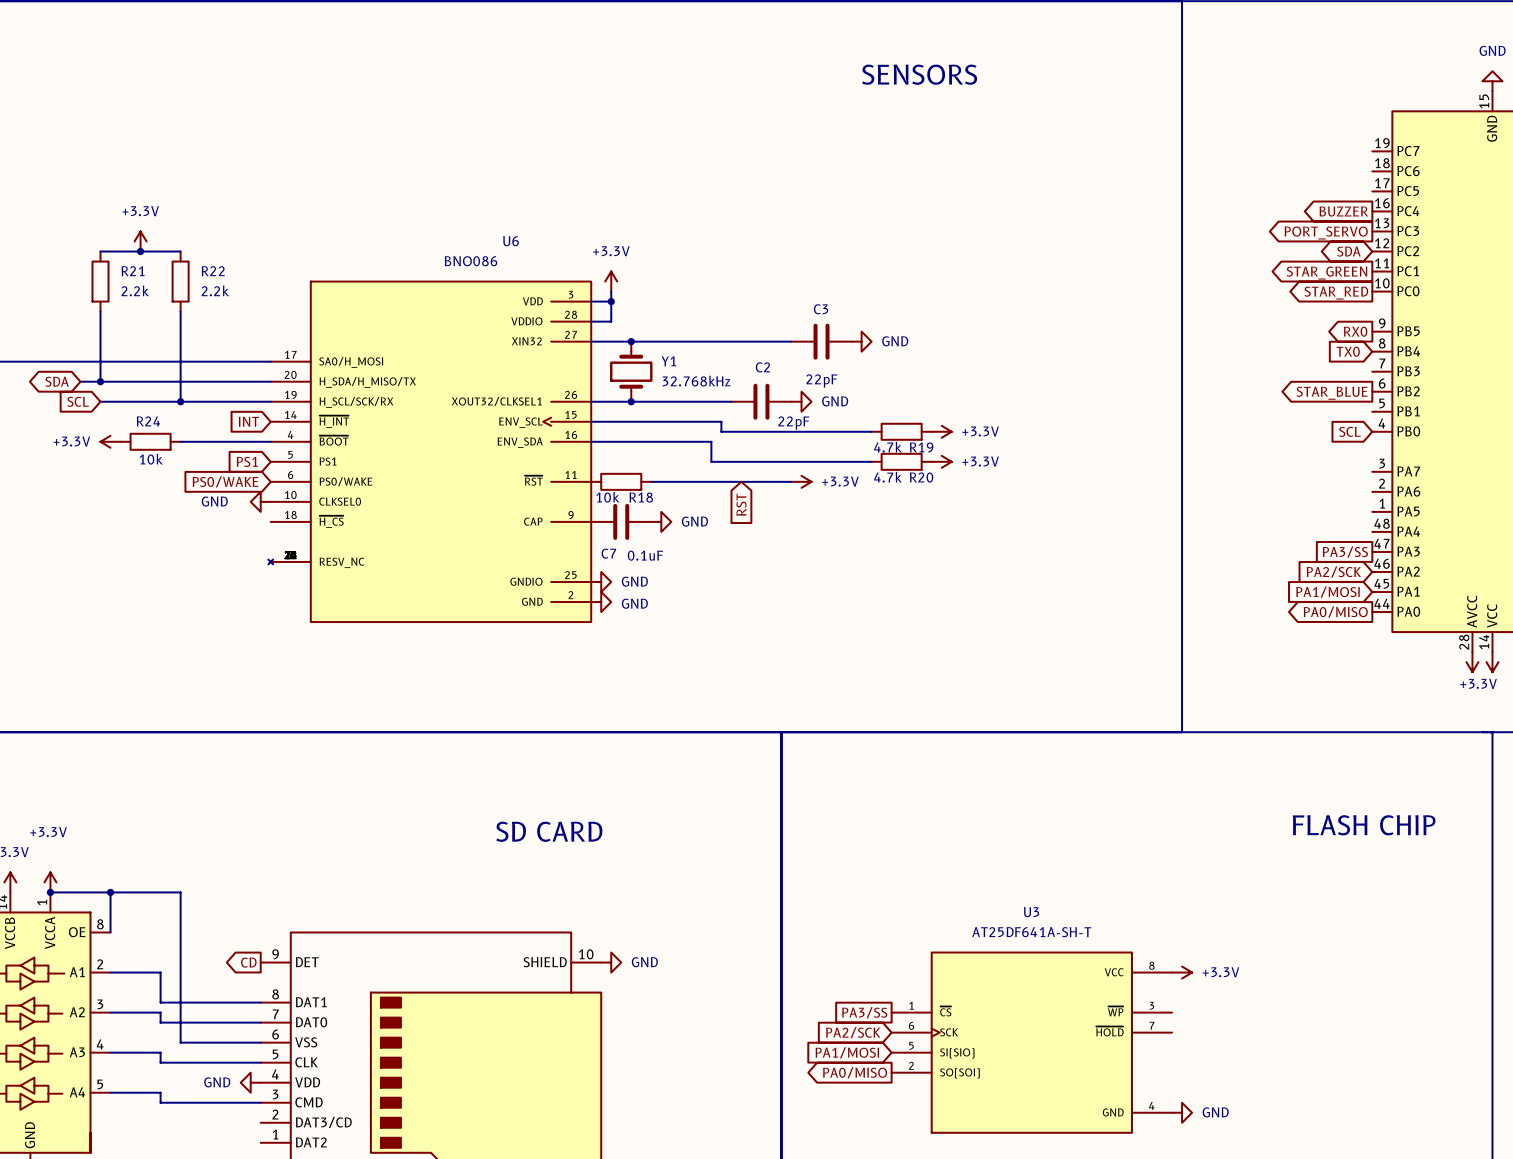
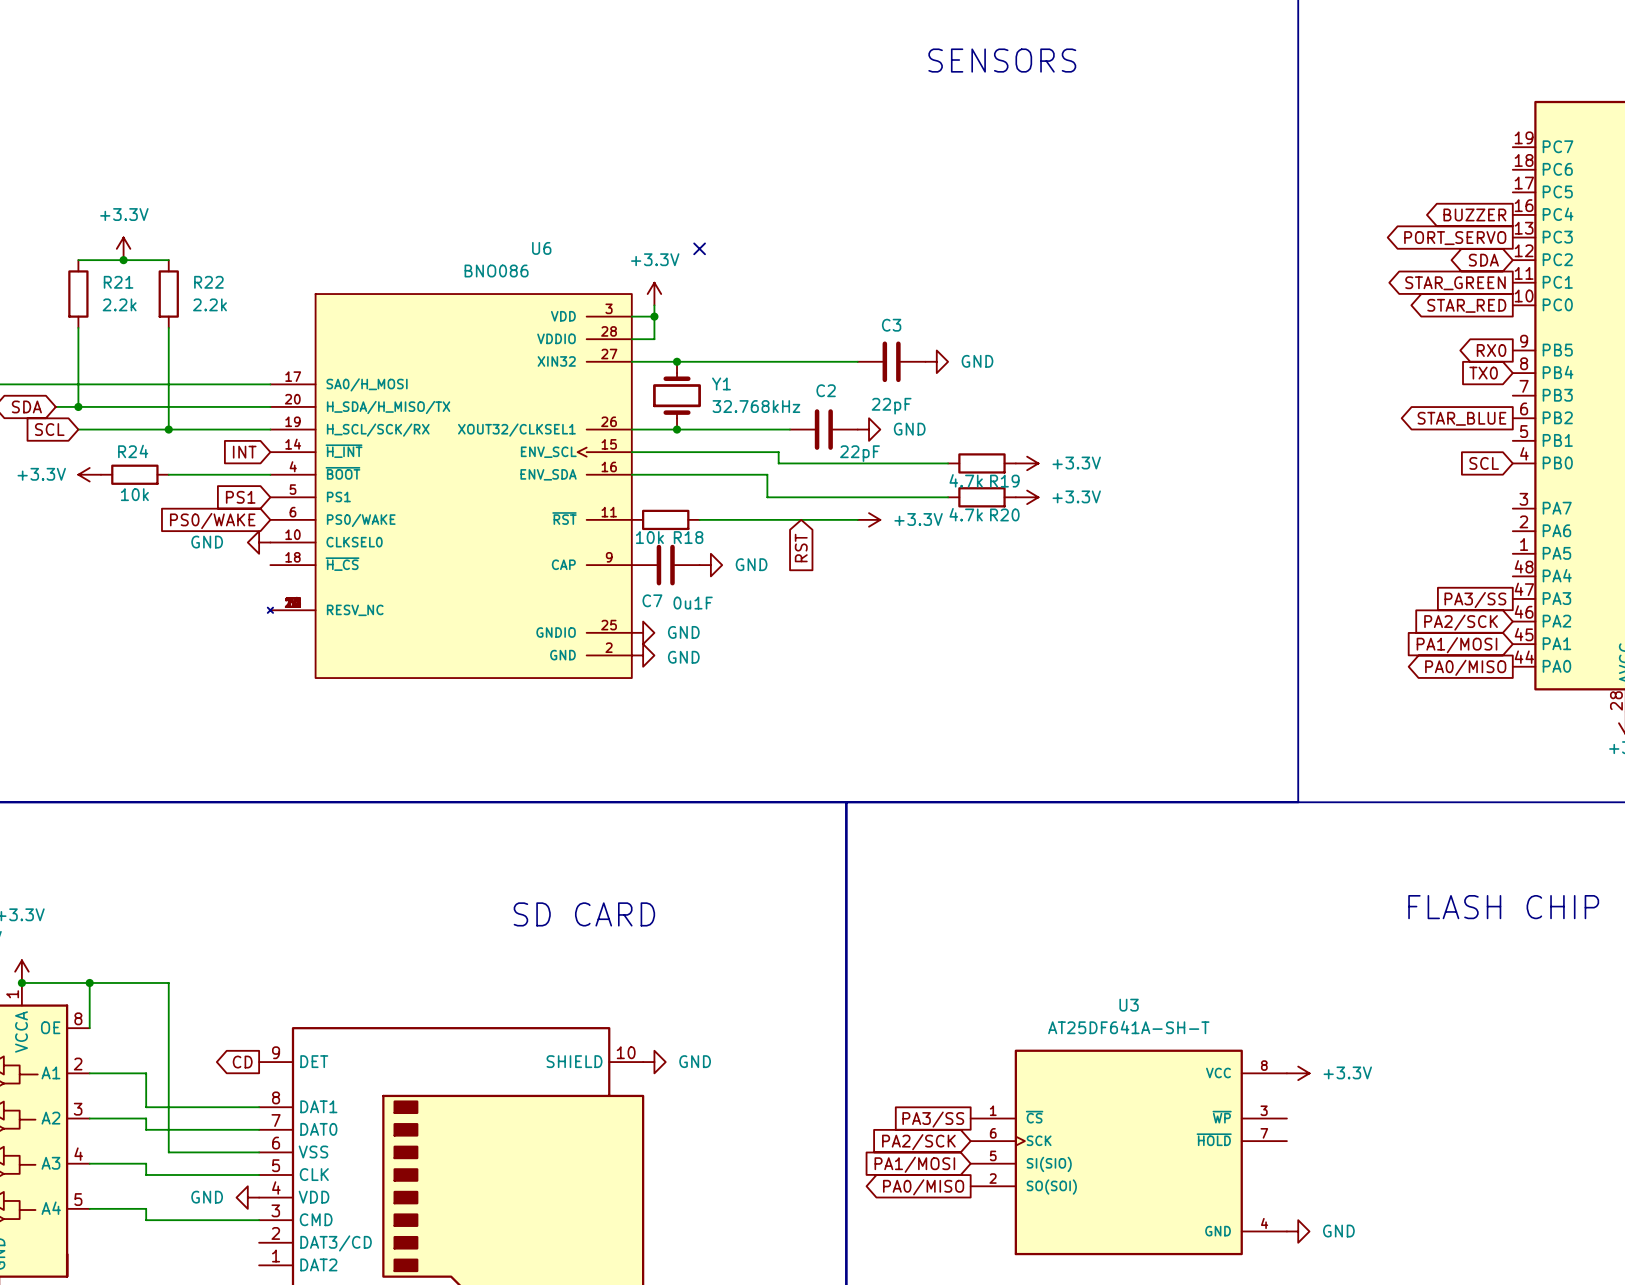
no-connect mark: none -> (699, 248)
C7 value: 0.1uF (645, 555) -> 0u1F (693, 603)

